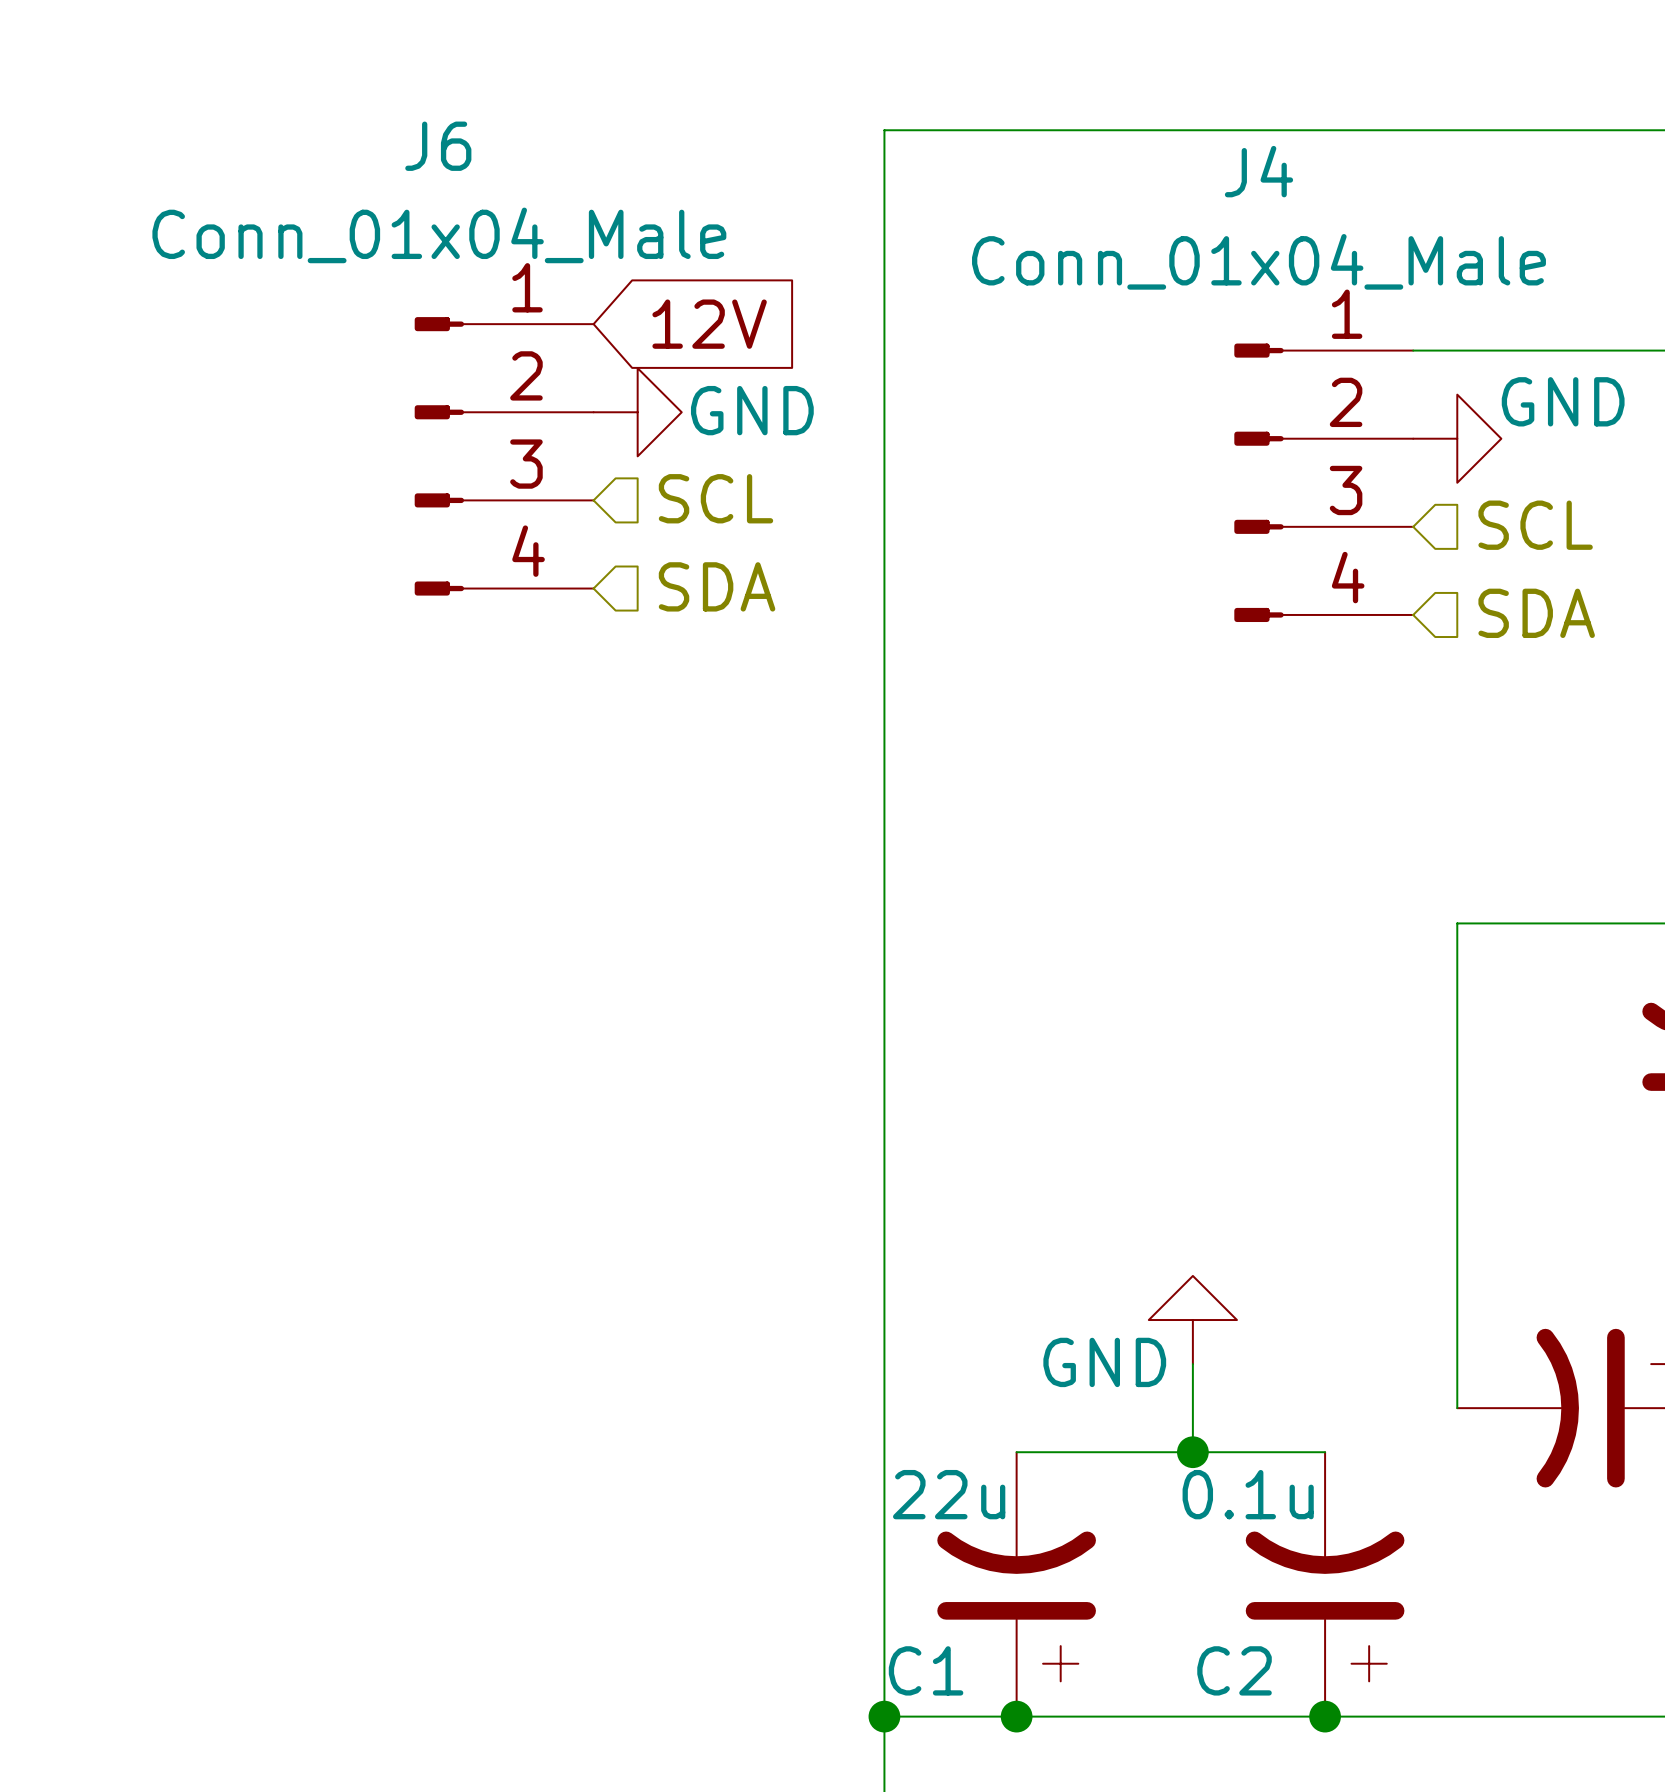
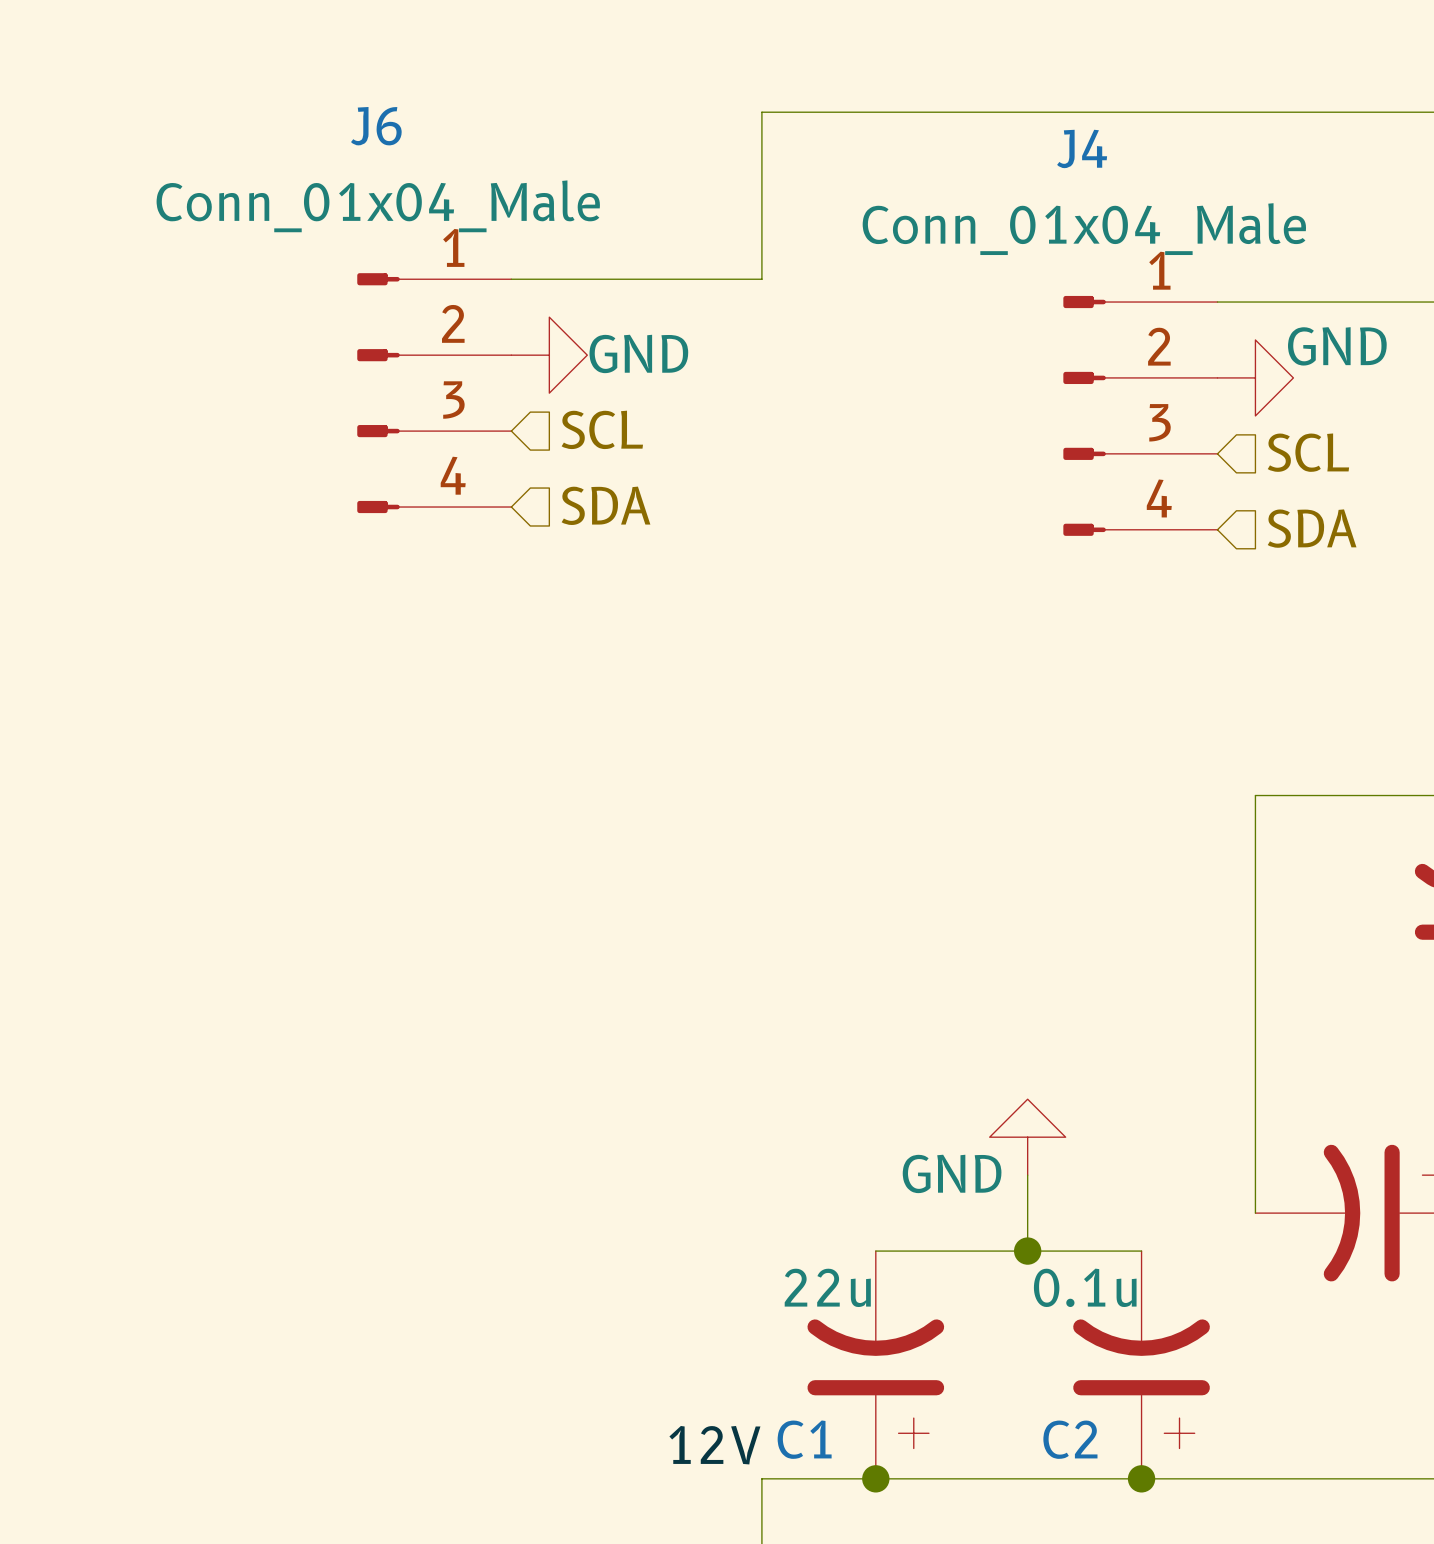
global label: 12V (709, 324) -> none
wire: (884, 324) (884, 1716) -> (761, 279) (511, 279)
label: none -> 12V (714, 1445)
junction: (884, 1716) -> none

